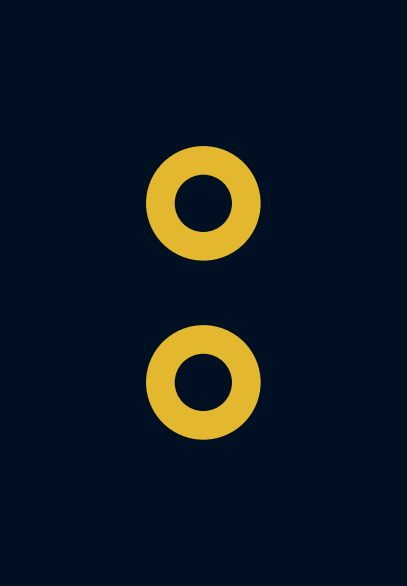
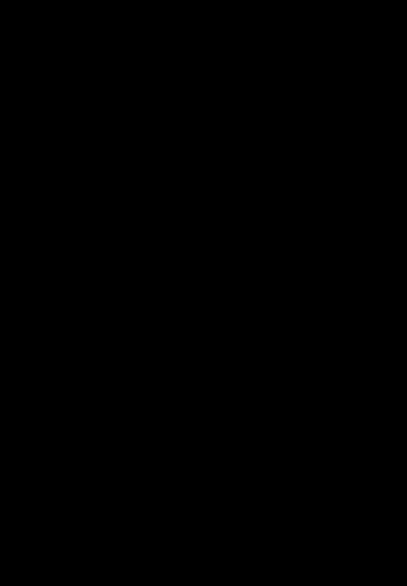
part: (203, 292) -> none

